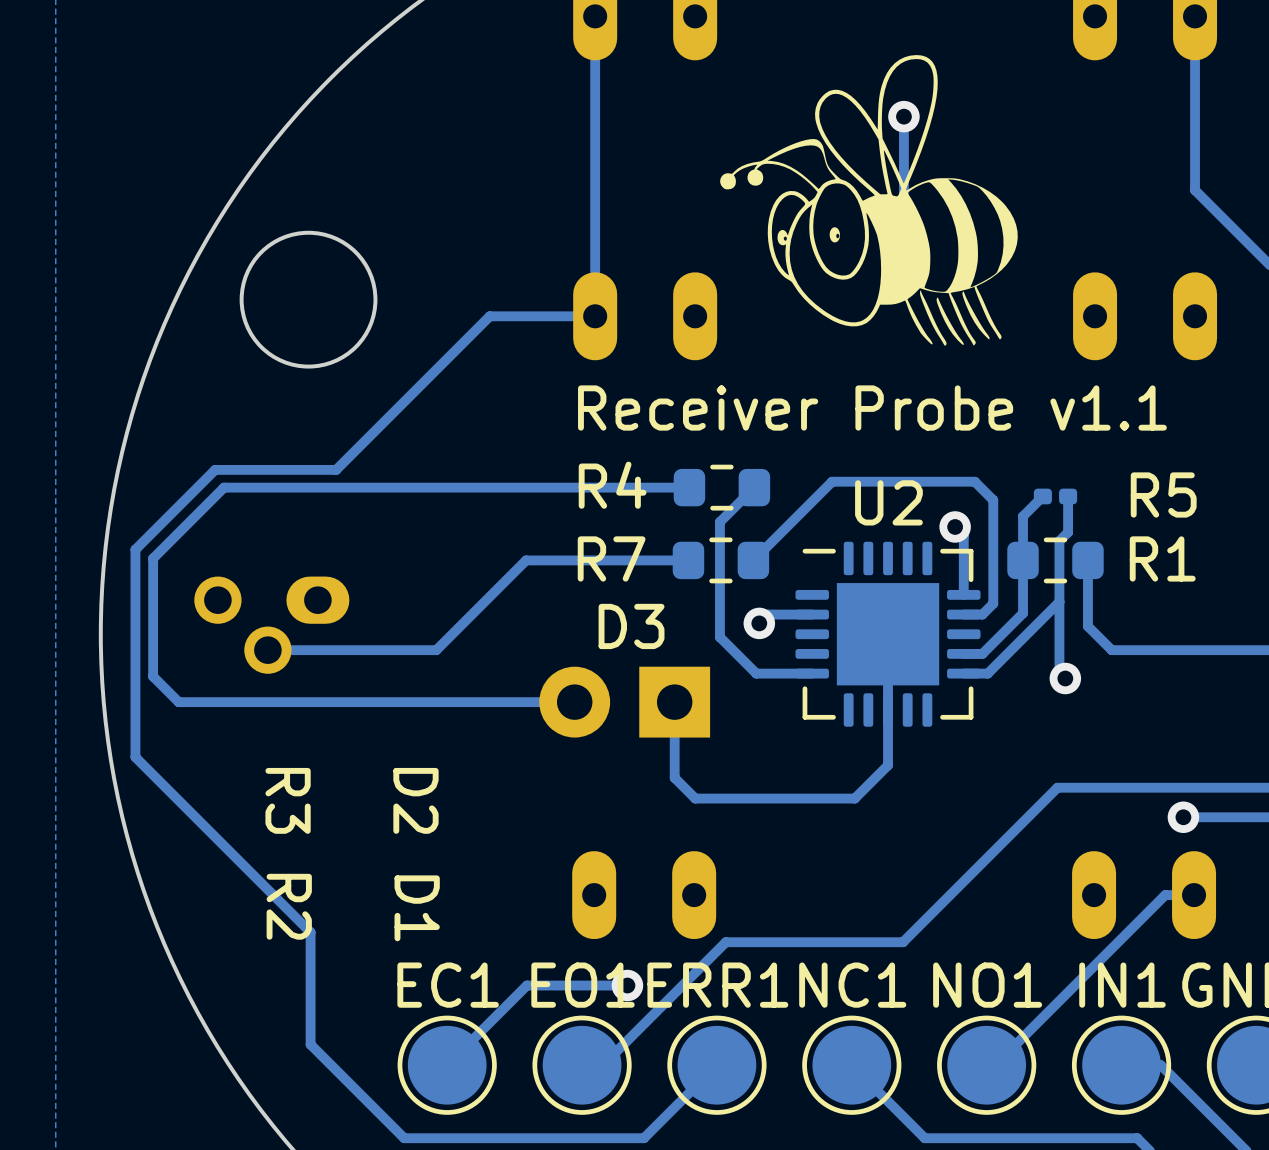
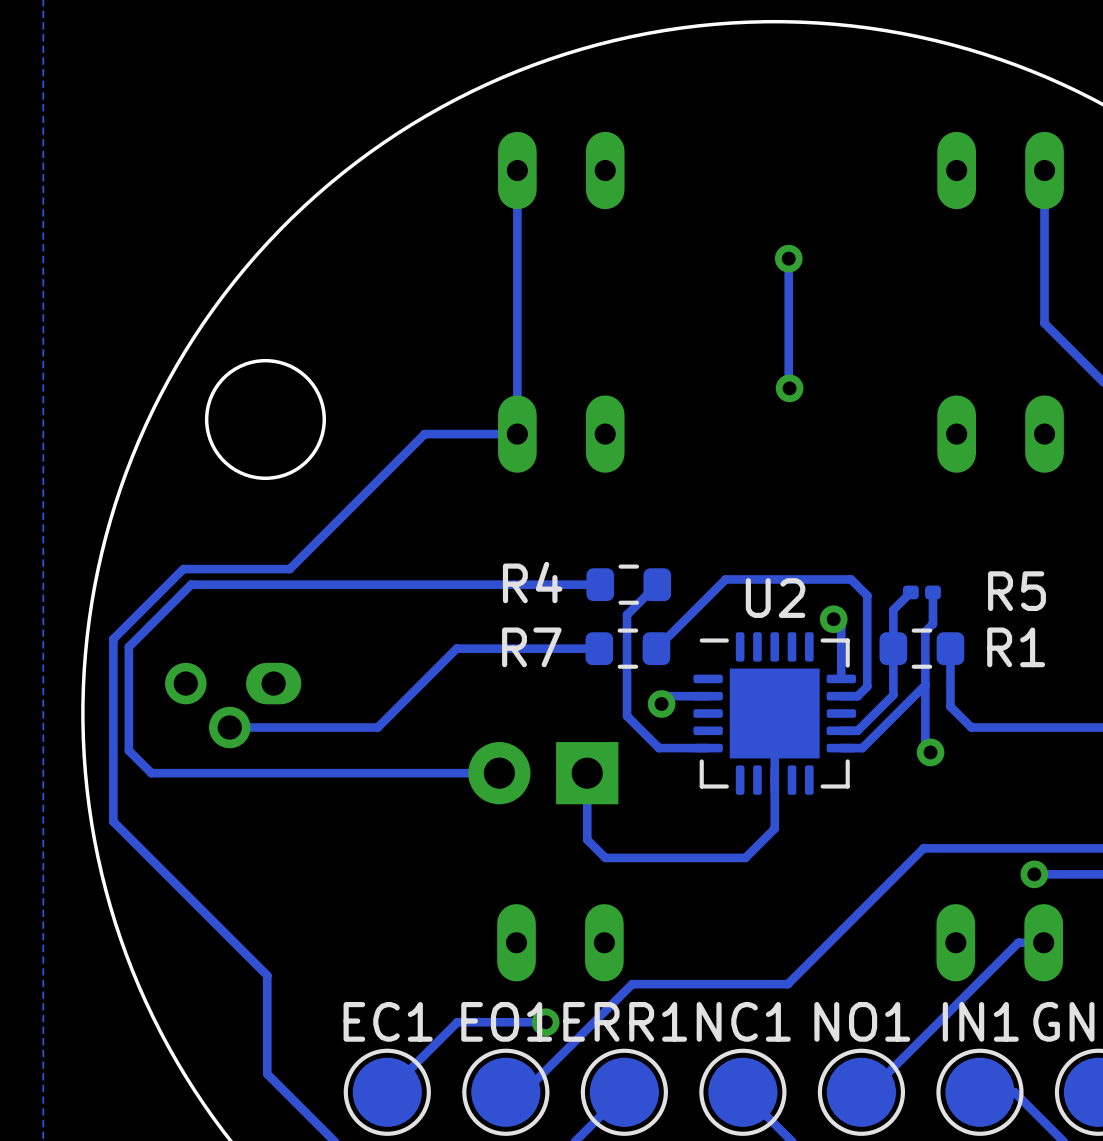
drawing: [720, 55, 1018, 346] -> none
D3 name: D3 (631, 626) -> none
R3: (288, 800) -> none
D2: (415, 800) -> none
R2: (289, 906) -> none
D1: (417, 908) -> none

